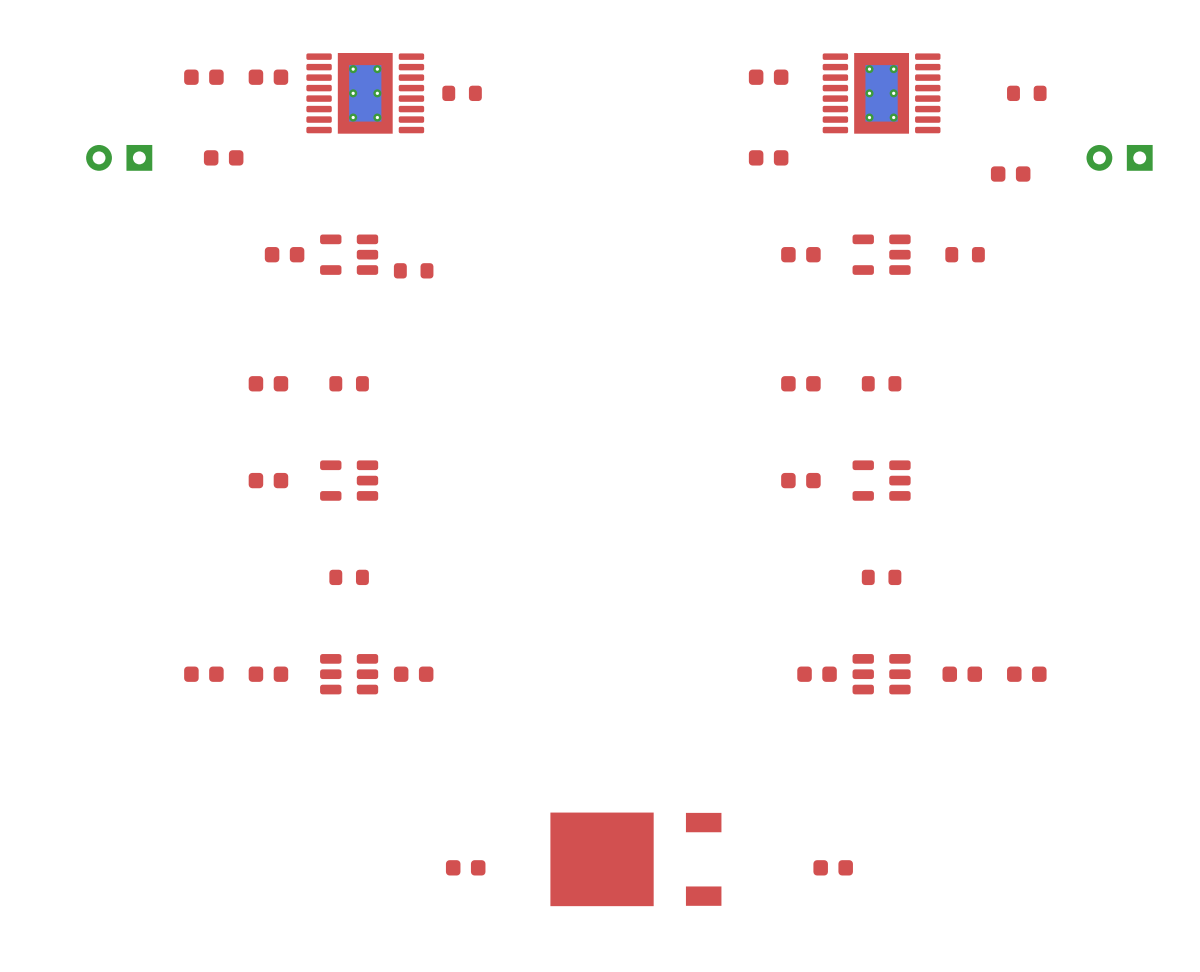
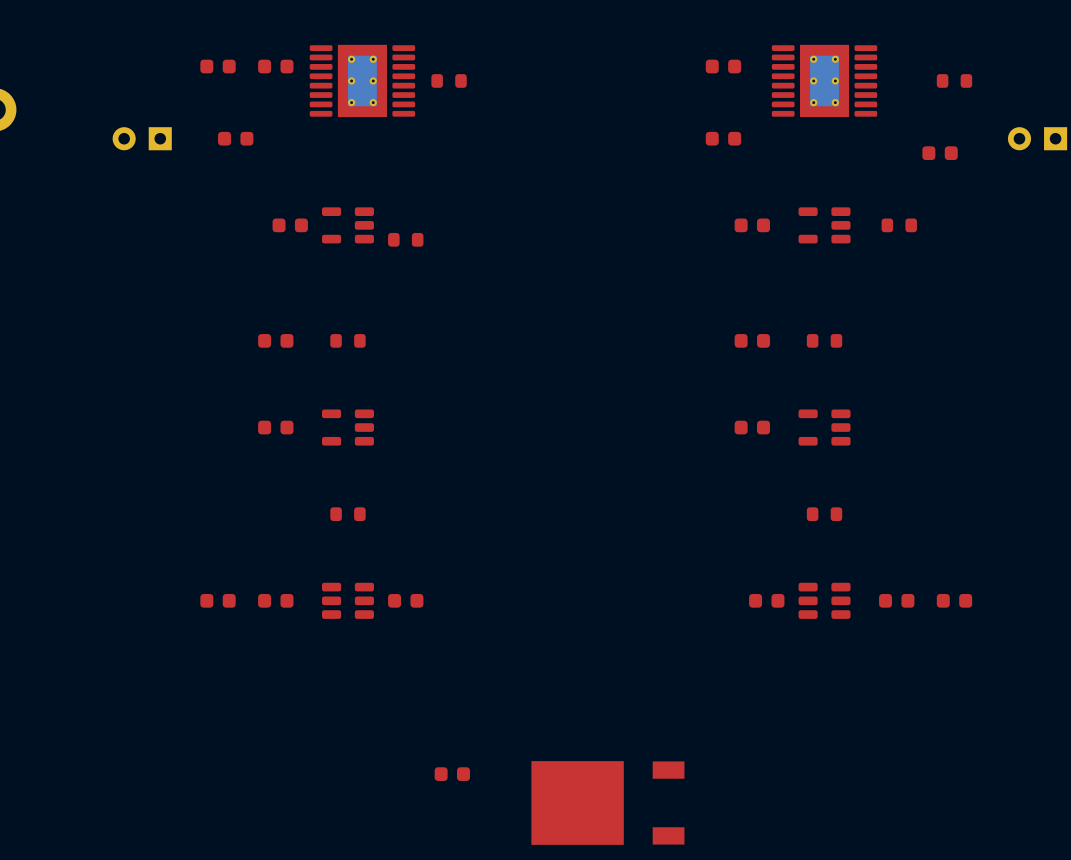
part position: (635, 859) -> (607, 802)
part: (833, 867) -> none

